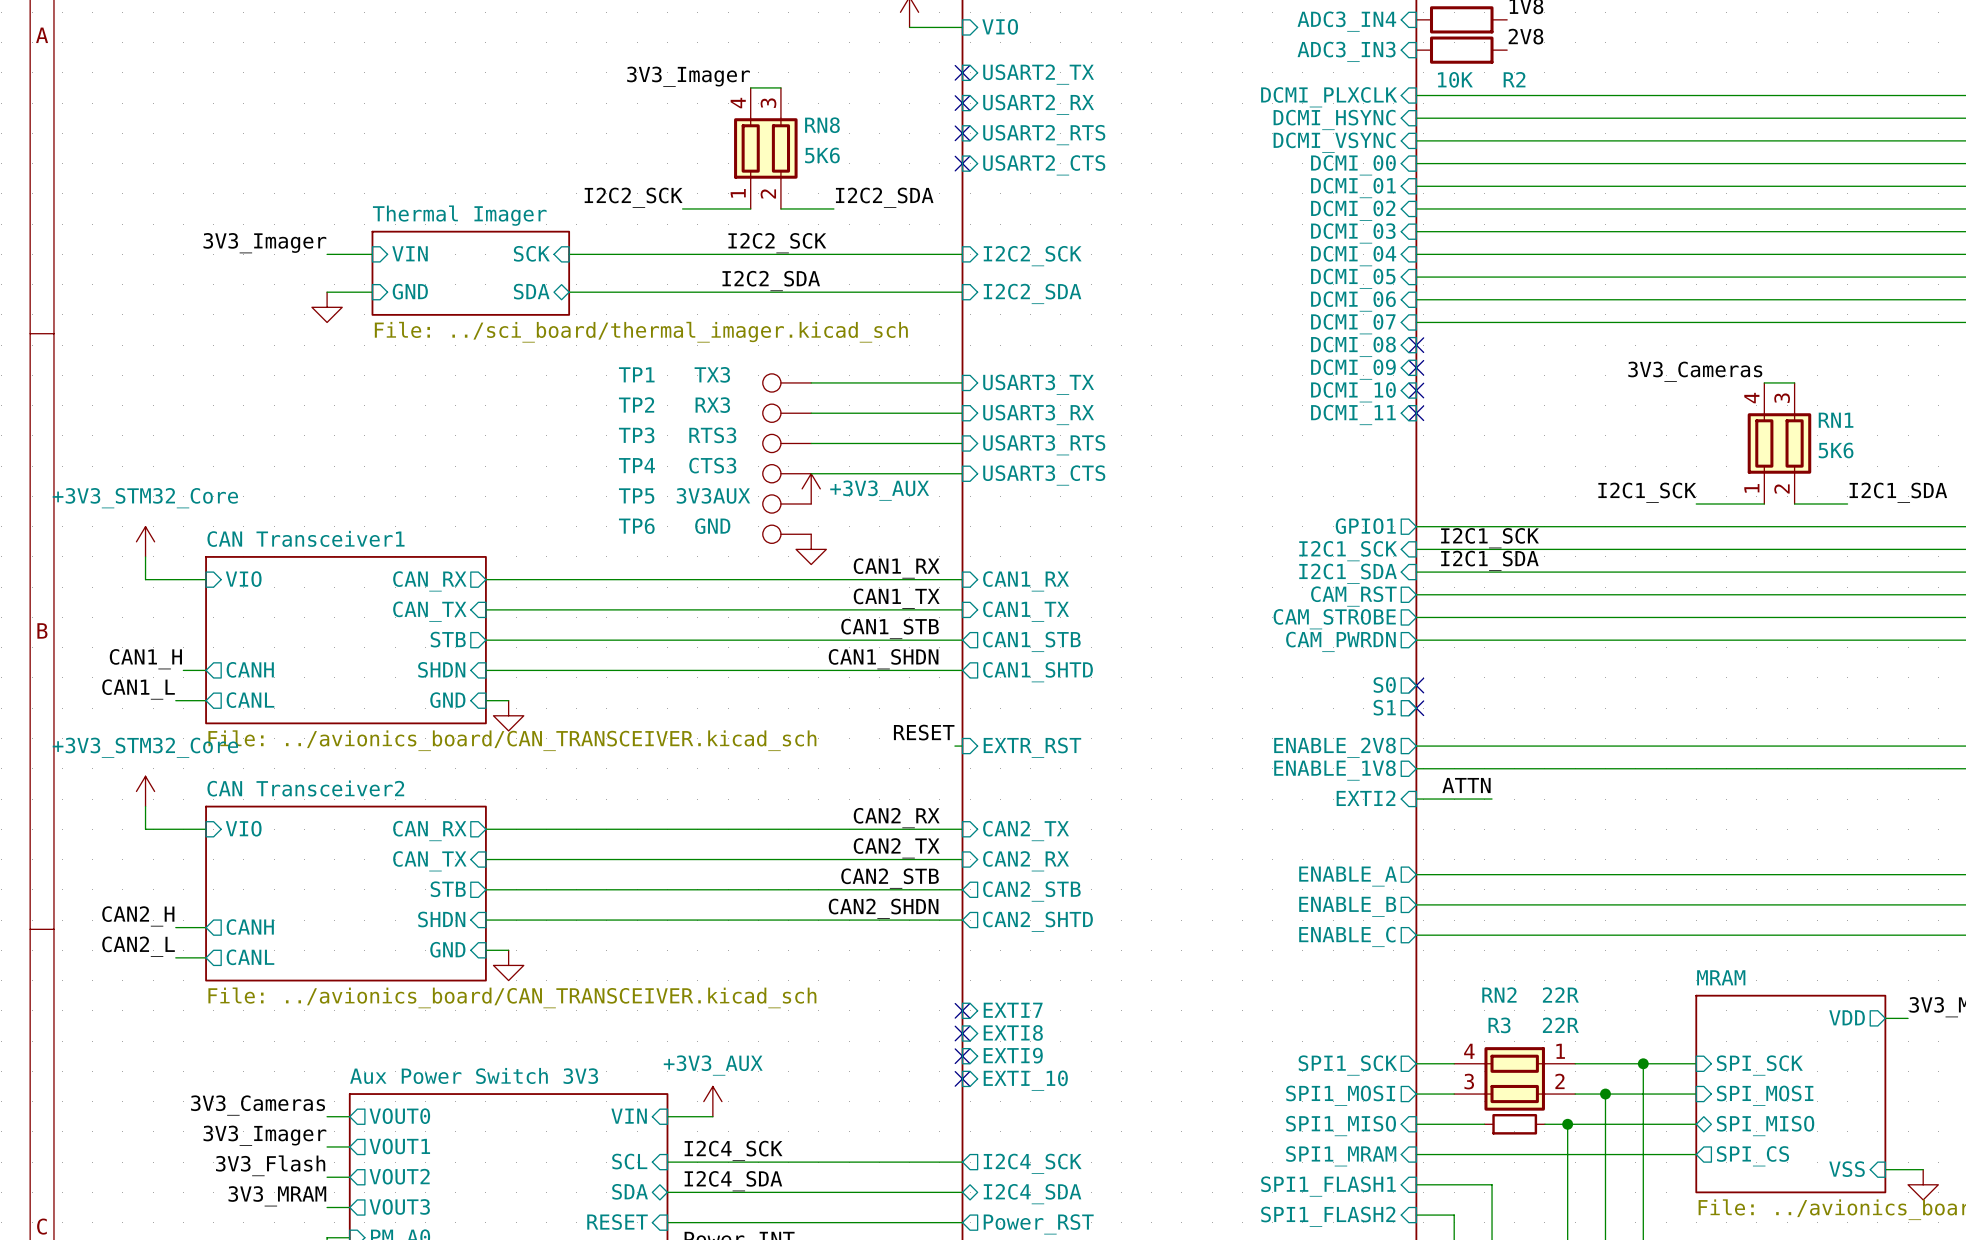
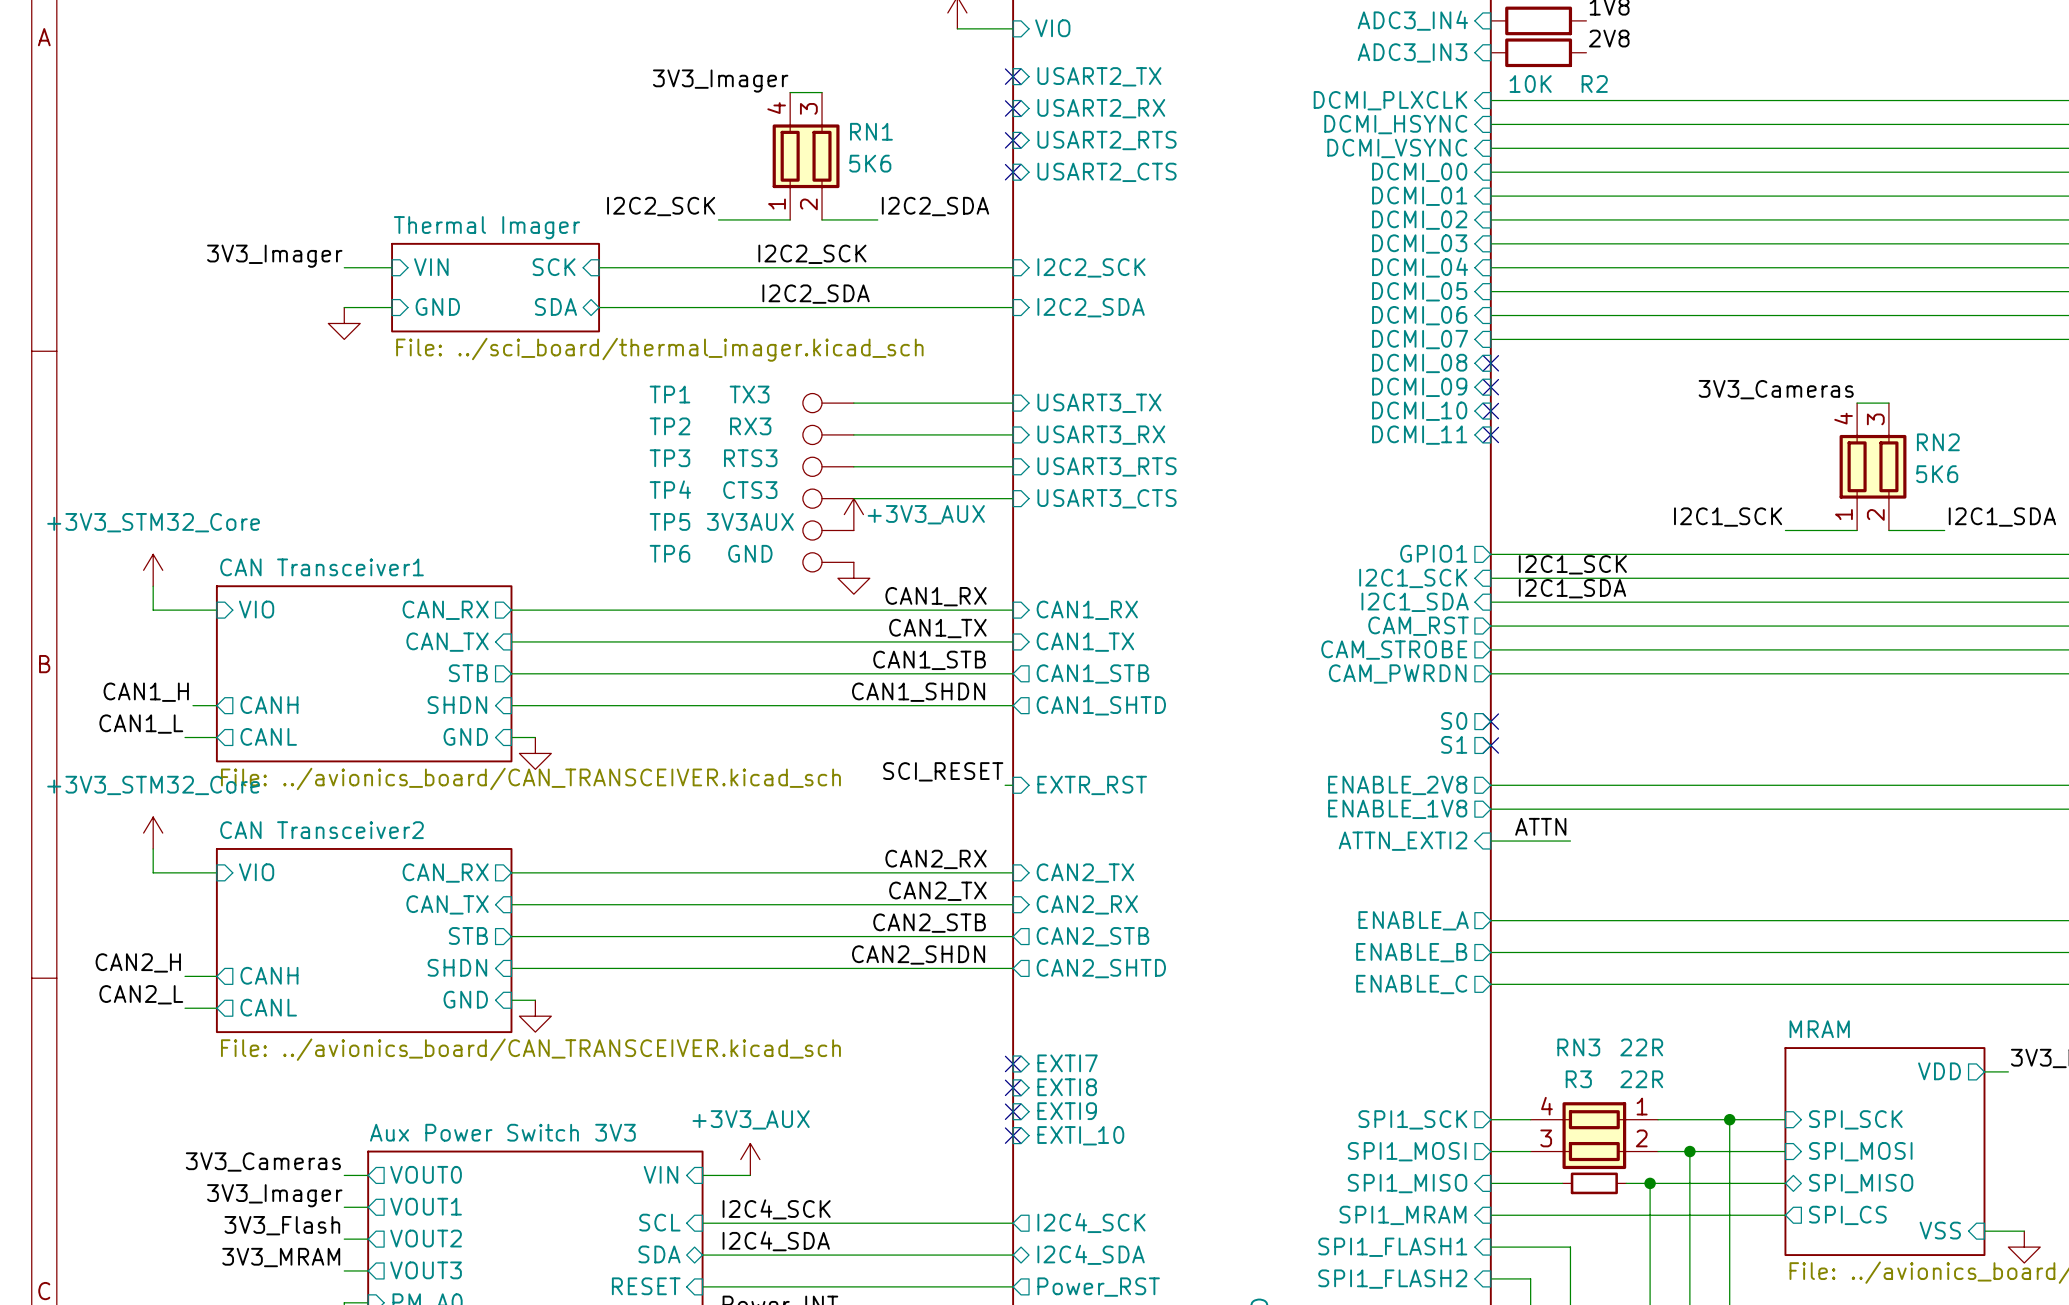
RN8 name: RN8 (822, 125) -> RN1 (871, 131)
RN1 name: RN1 (1836, 420) -> RN2 (1938, 442)
label: RESET (924, 732) -> SCI_RESET (943, 771)
sheet pin: EXTI2 (1366, 798) -> ATTN_EXTI2 (1403, 841)
RN2 name: RN2 (1499, 994) -> RN3 (1578, 1047)

